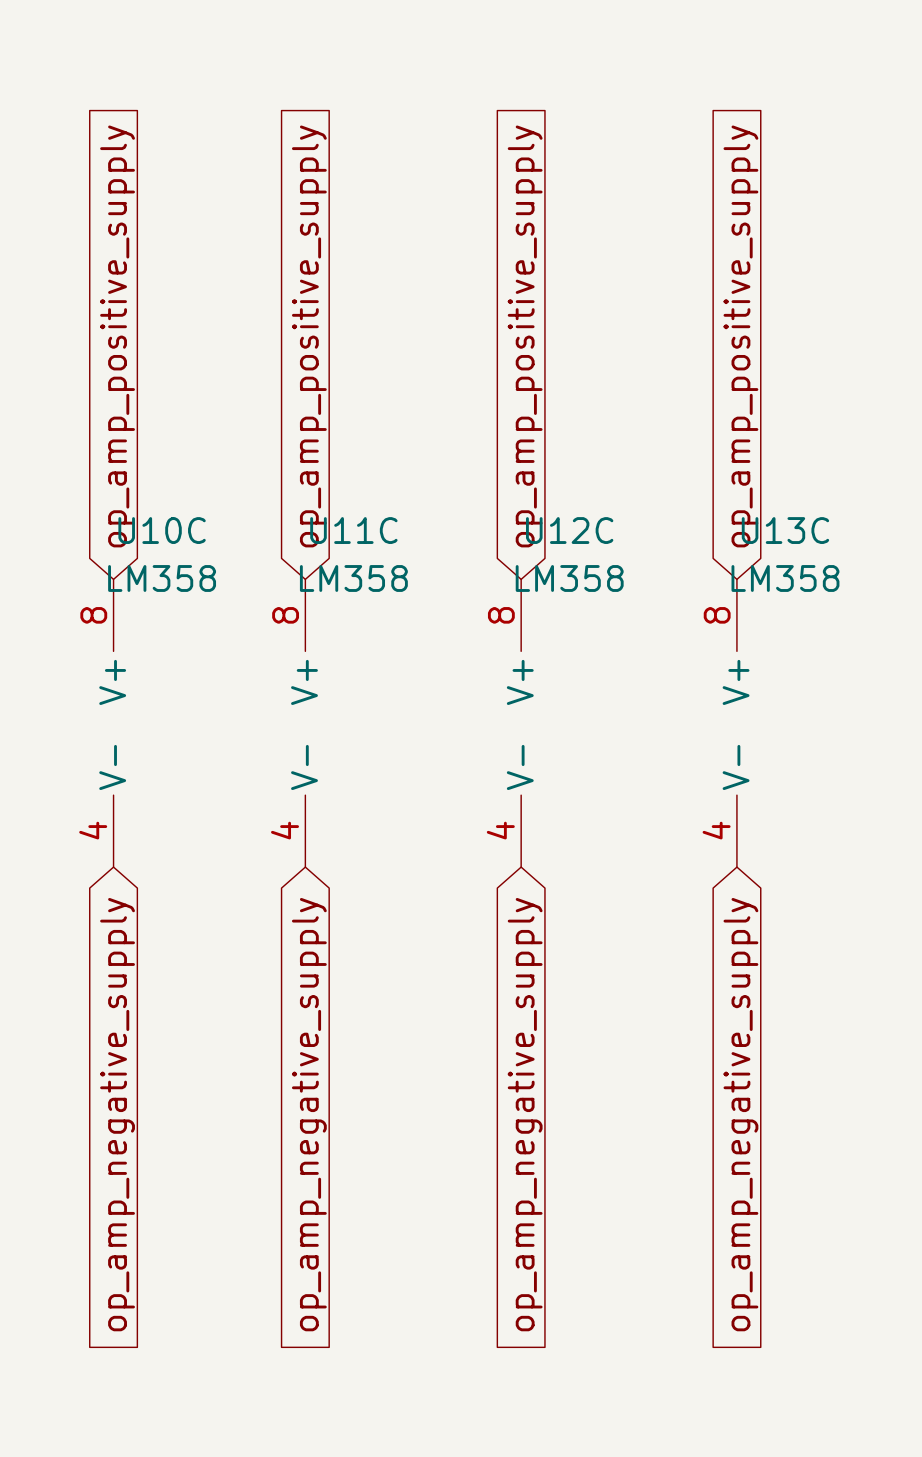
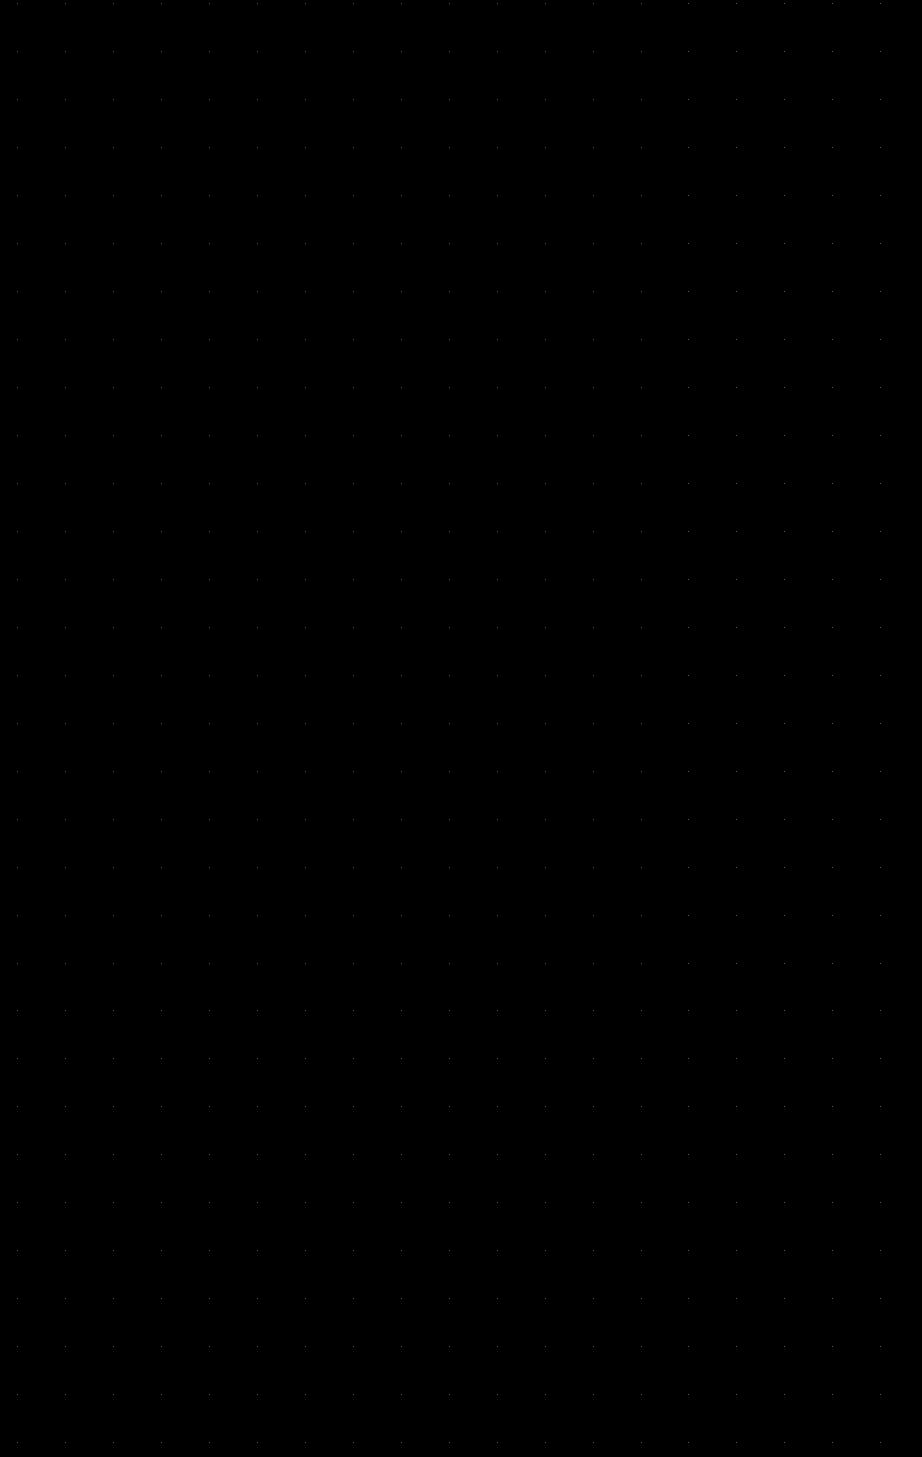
global label: op_amp_positive_supply (117, 336) -> none
global label: op_amp_positive_supply (309, 336) -> none
global label: op_amp_positive_supply (525, 336) -> none
global label: op_amp_positive_supply (740, 336) -> none
U10C: LM358 (113, 723) -> none
U11C: LM358 (305, 723) -> none
U12C: LM358 (521, 723) -> none
U13C: LM358 (736, 723) -> none
global label: op_amp_negative_supply (117, 1114) -> none
global label: op_amp_negative_supply (309, 1114) -> none
global label: op_amp_negative_supply (525, 1114) -> none
global label: op_amp_negative_supply (740, 1114) -> none

